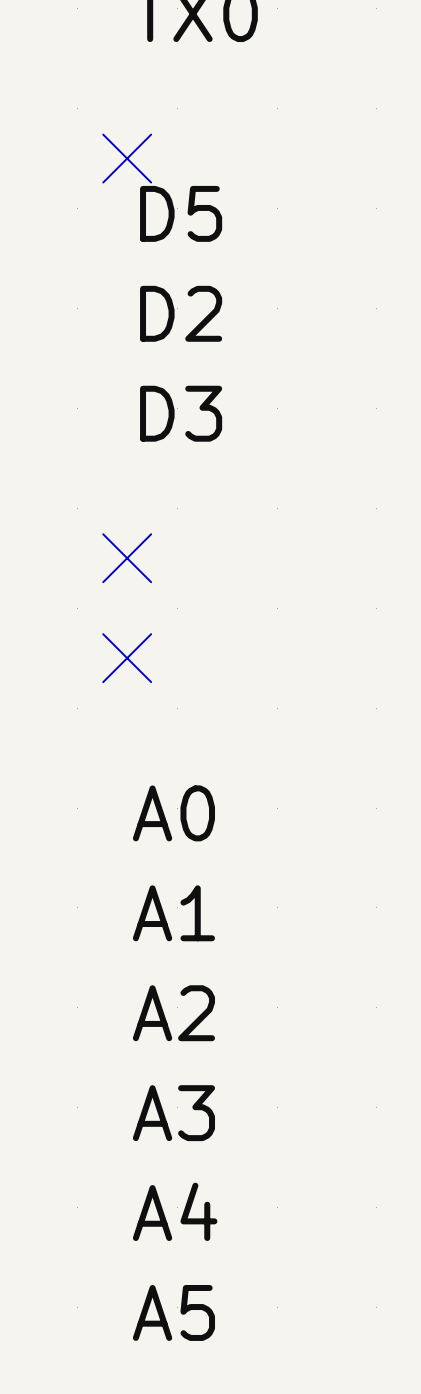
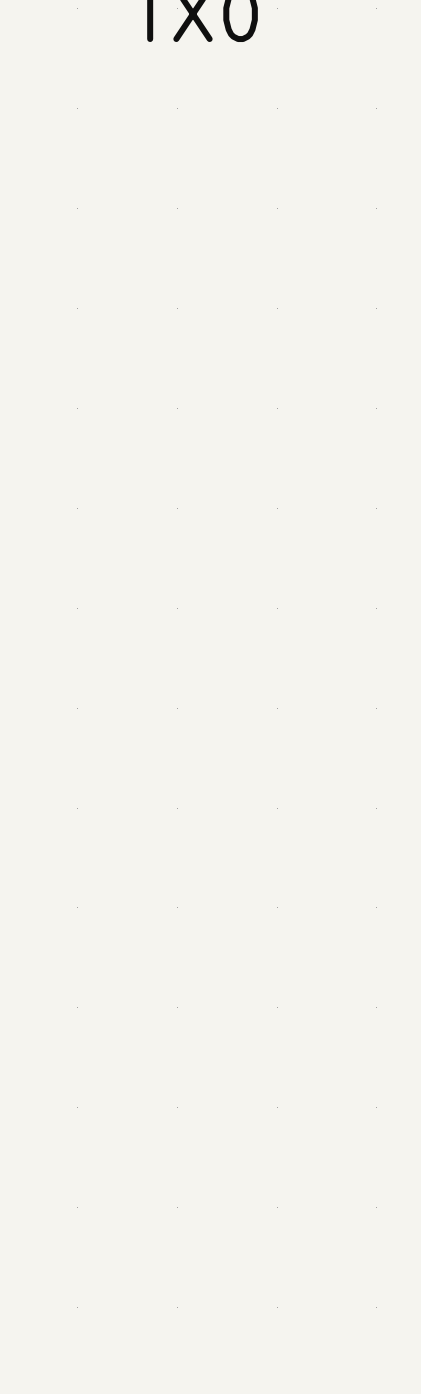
no-connect mark: (127, 158) -> none
label: D5 (181, 213) -> none
label: D2 (181, 313) -> none
label: D3 (181, 413) -> none
no-connect mark: (127, 558) -> none
no-connect mark: (127, 658) -> none
label: A0 (173, 813) -> none
label: A1 (173, 913) -> none
label: A2 (173, 1013) -> none
label: A3 (173, 1113) -> none
label: A4 (175, 1211) -> none
label: A5 (173, 1312) -> none

